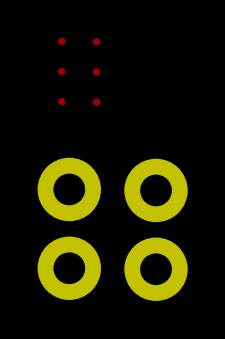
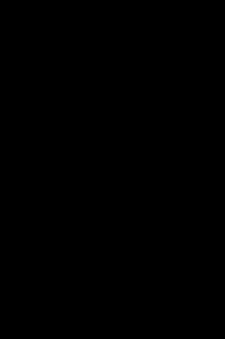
part: (61, 41) -> none
part: (96, 41) -> none
part: (61, 71) -> none
part: (96, 72) -> none
part: (61, 101) -> none
part: (96, 102) -> none
part: (69, 189) -> none
part: (156, 190) -> none
part: (69, 268) -> none
part: (156, 269) -> none

